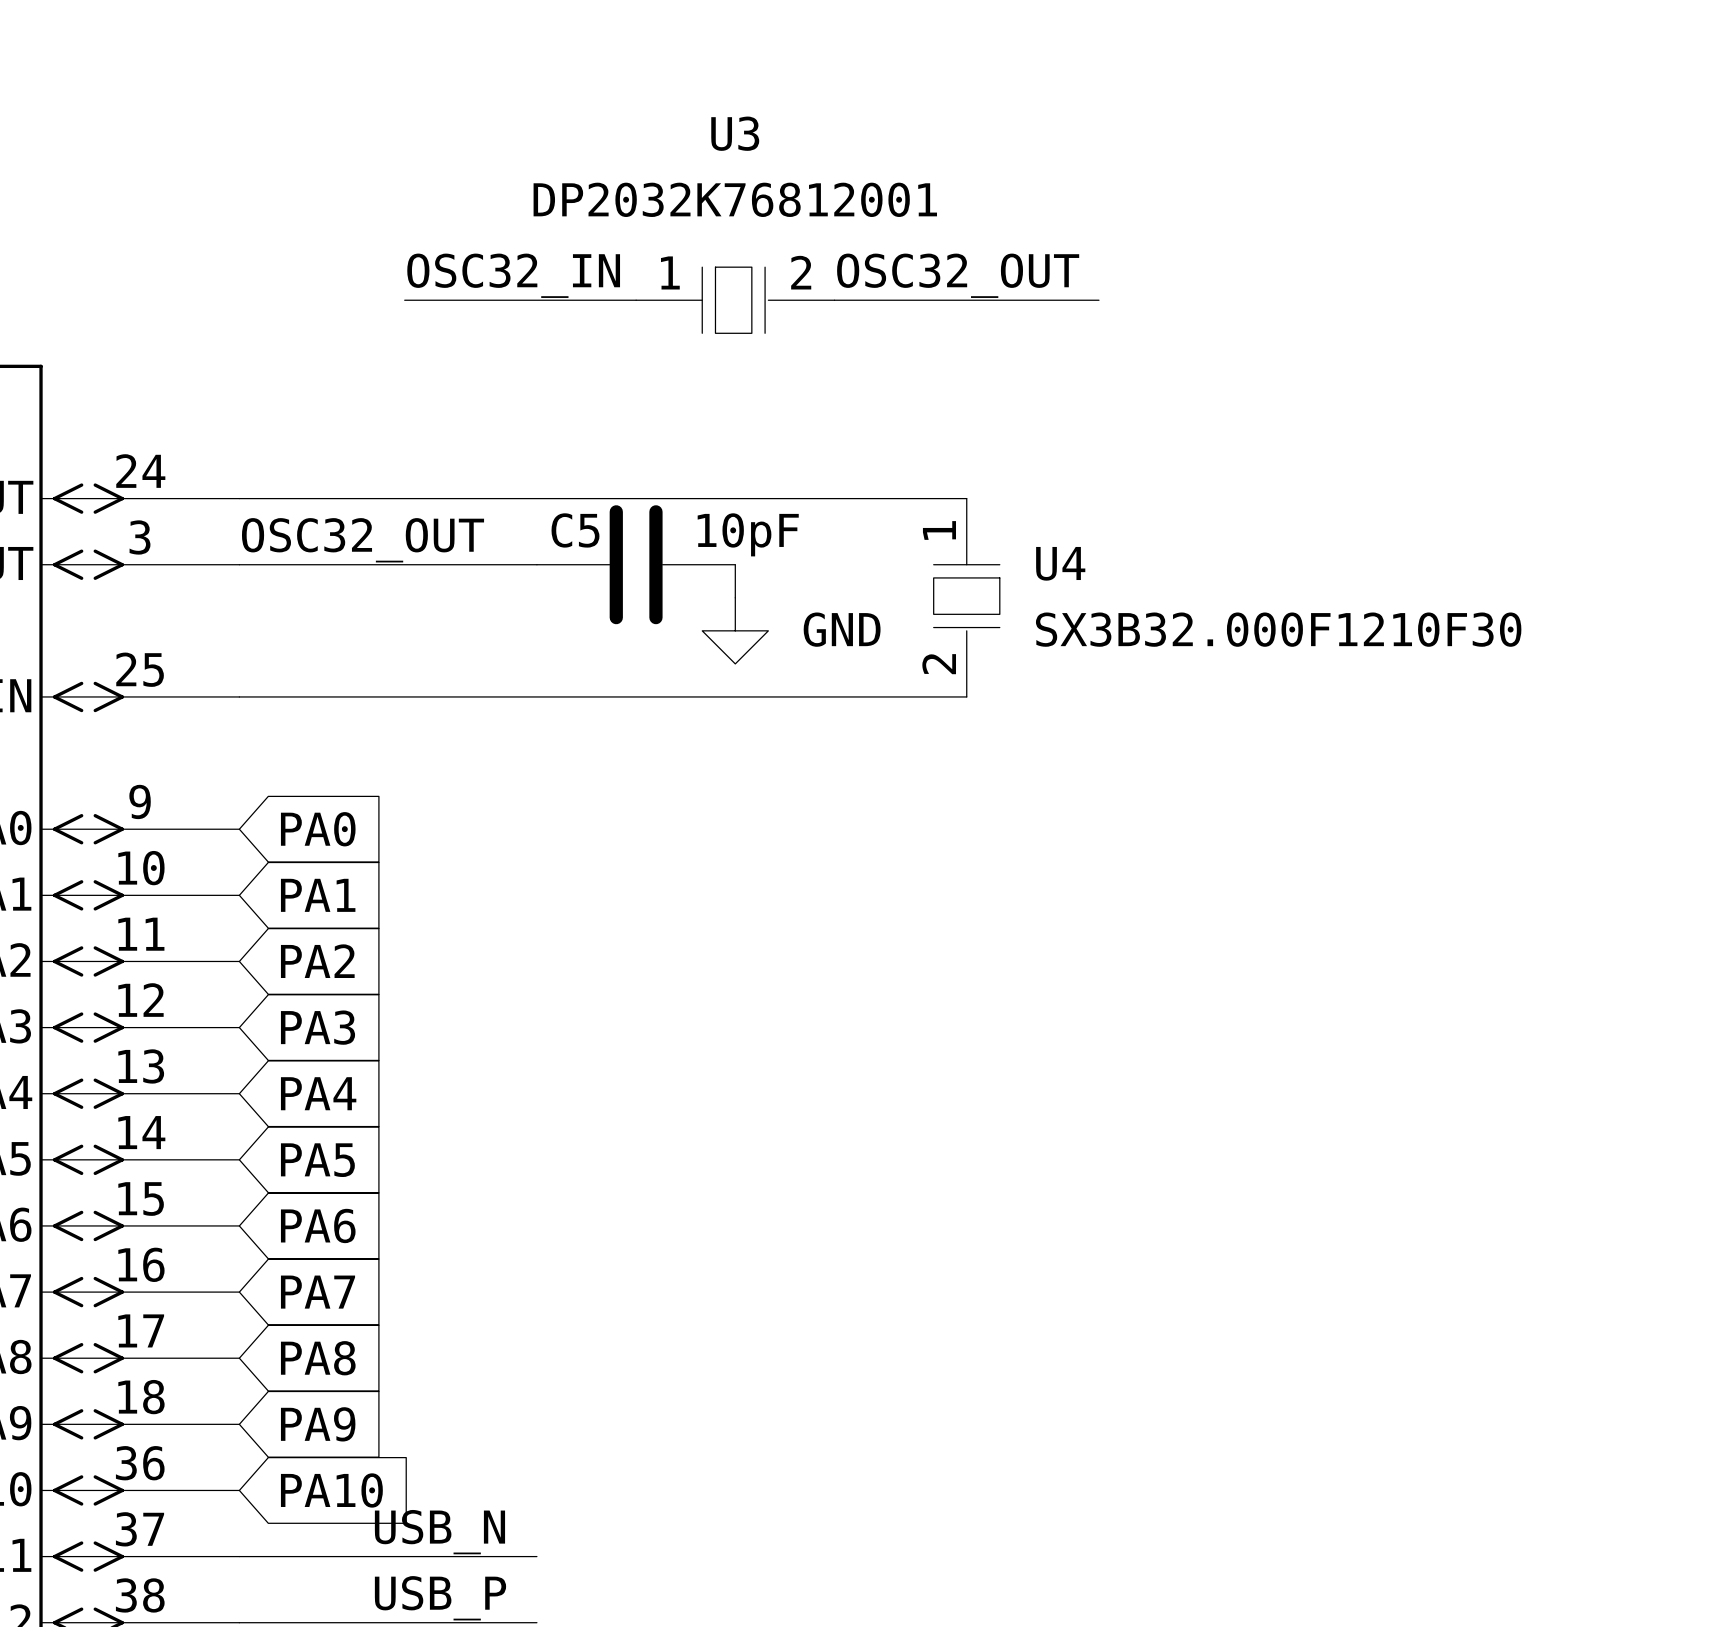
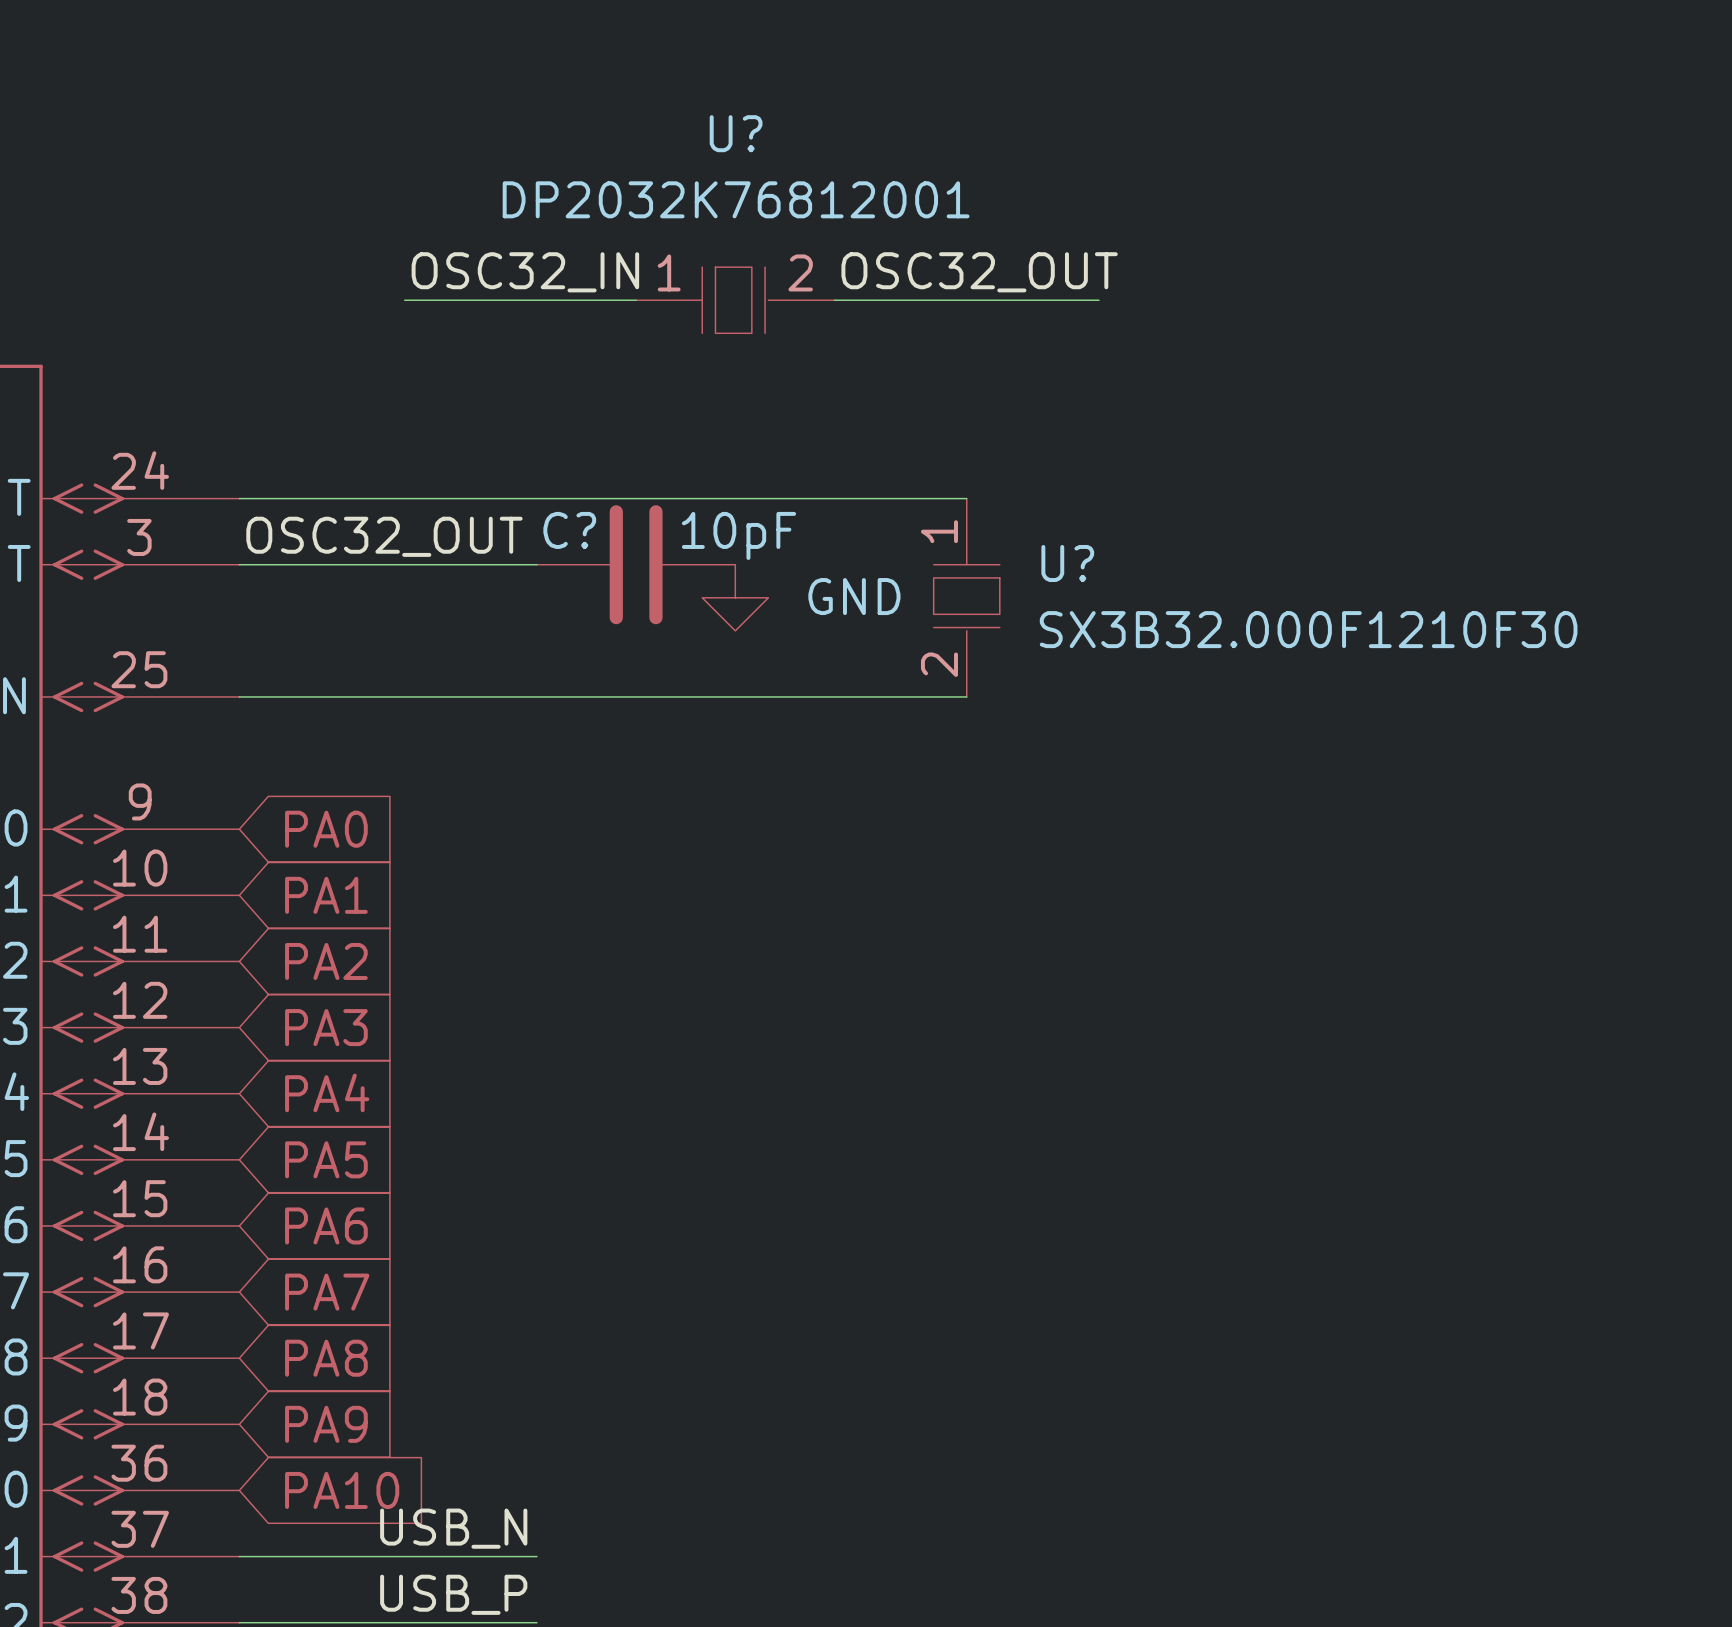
U3 name: U3 (735, 133) -> U? (736, 133)
C5 name: C5 (575, 530) -> C? (569, 530)
U4 name: U4 (1060, 563) -> U? (1067, 563)
power symbol position: GND (735, 630) -> GND (735, 597)

